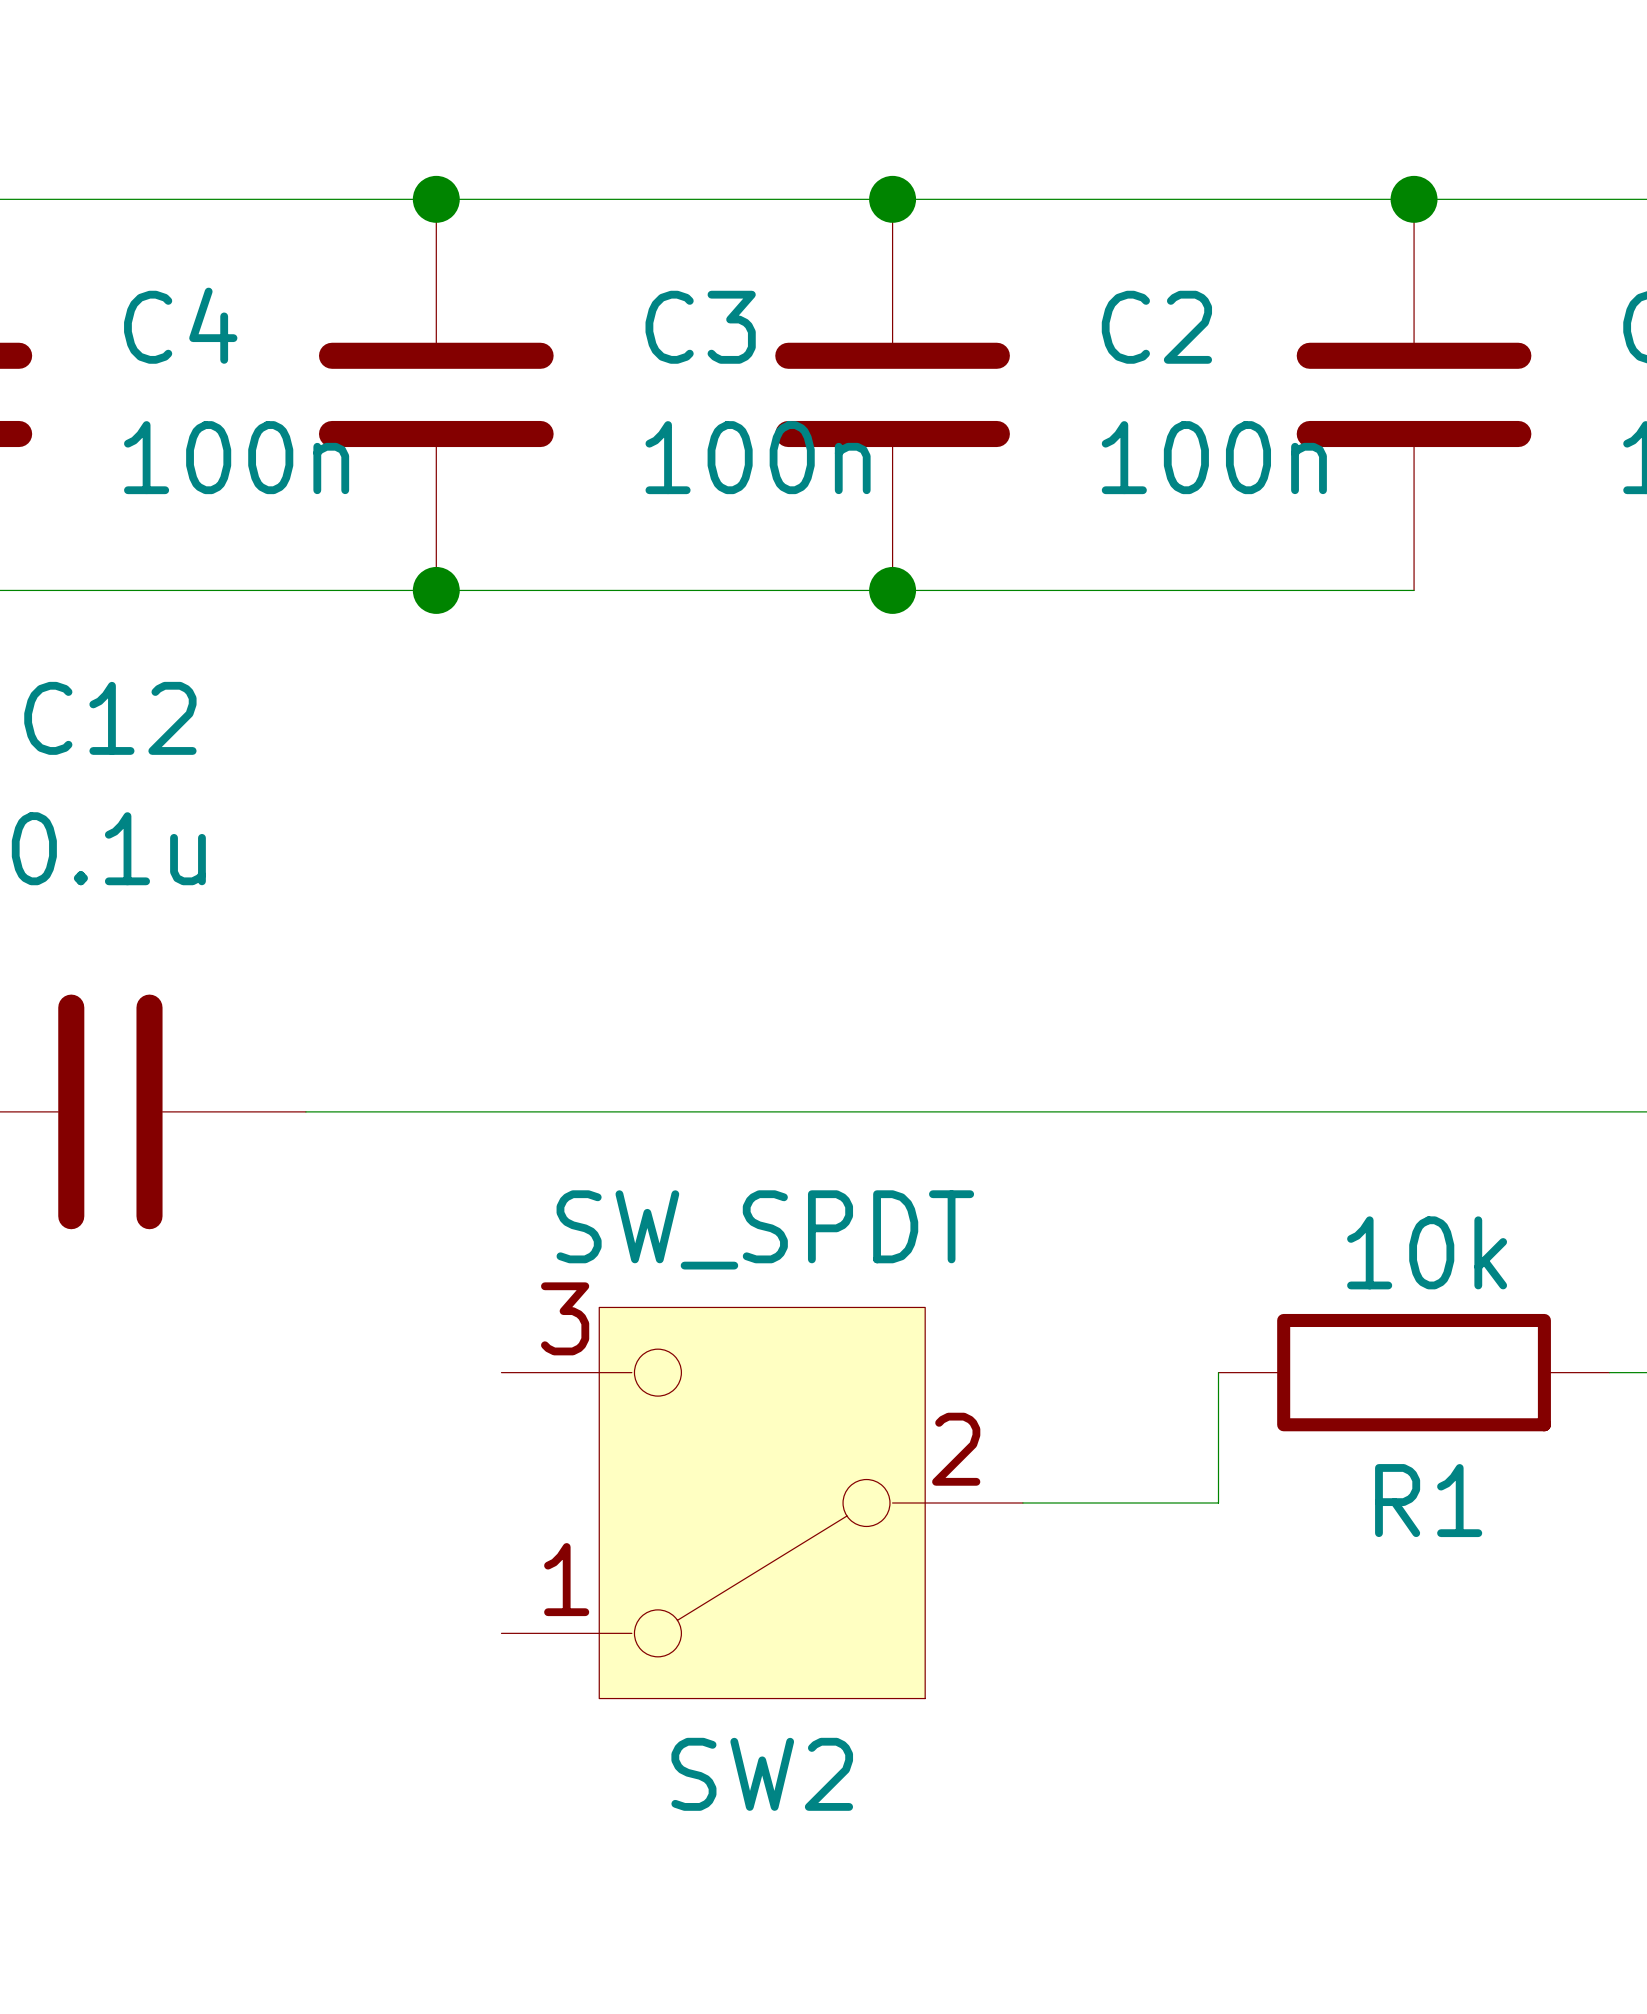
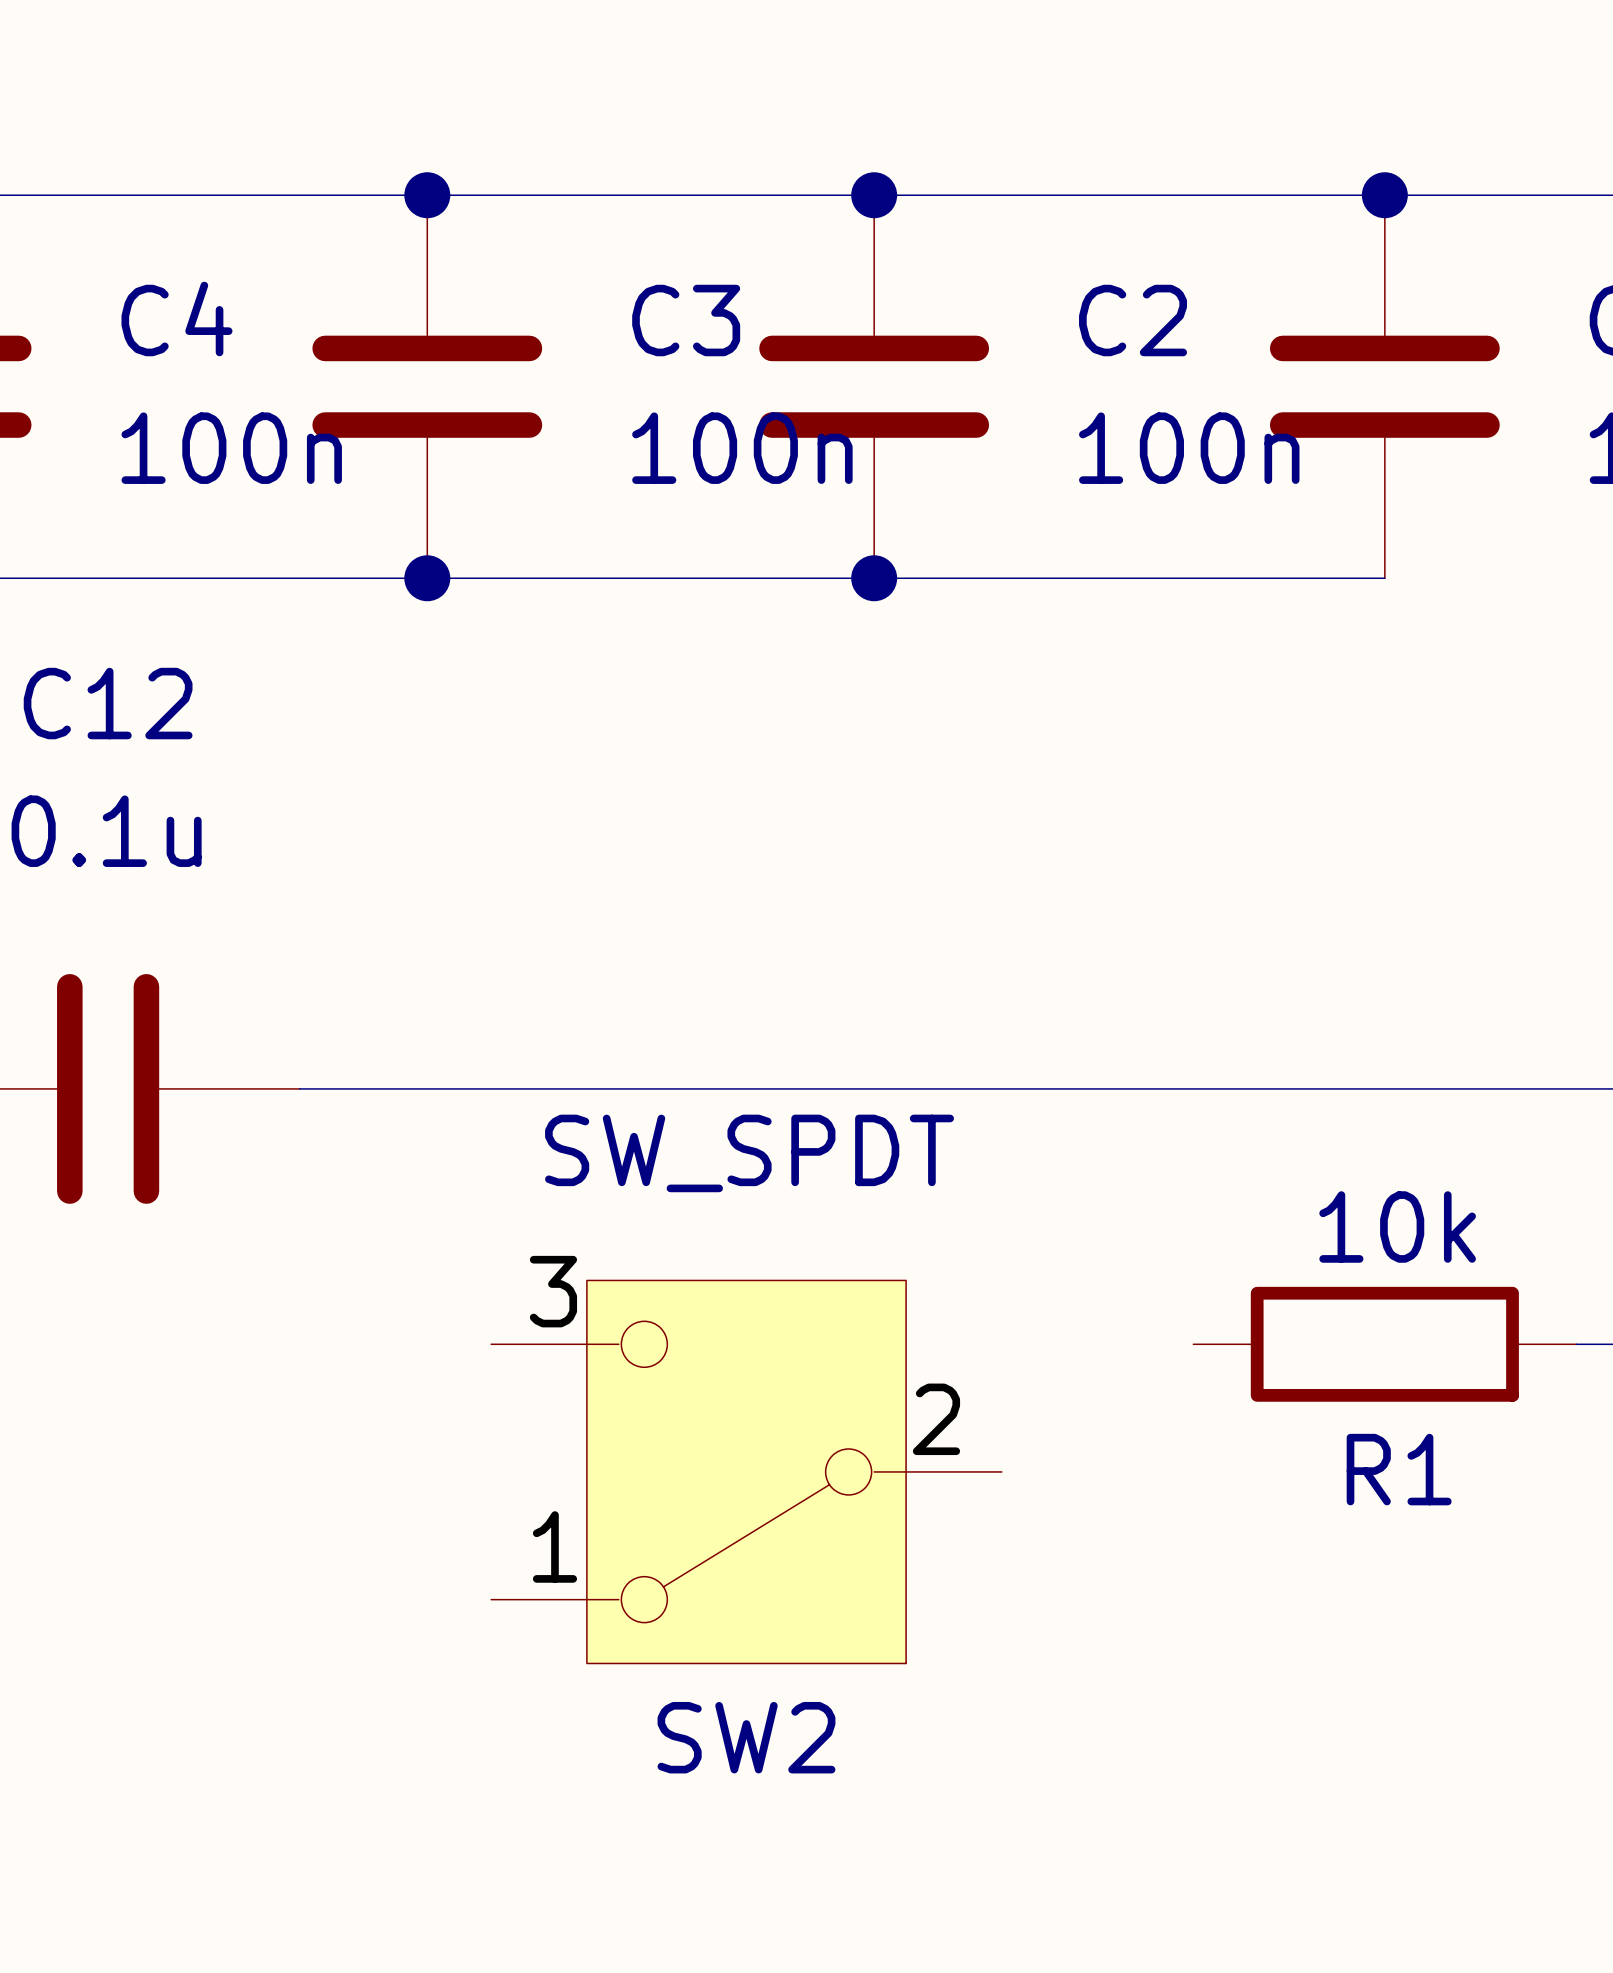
SW2 value position: SW_SPDT (765, 1229) -> SW_SPDT (749, 1153)
wire: (1218, 1372) (1218, 1502) (1022, 1502) -> none

